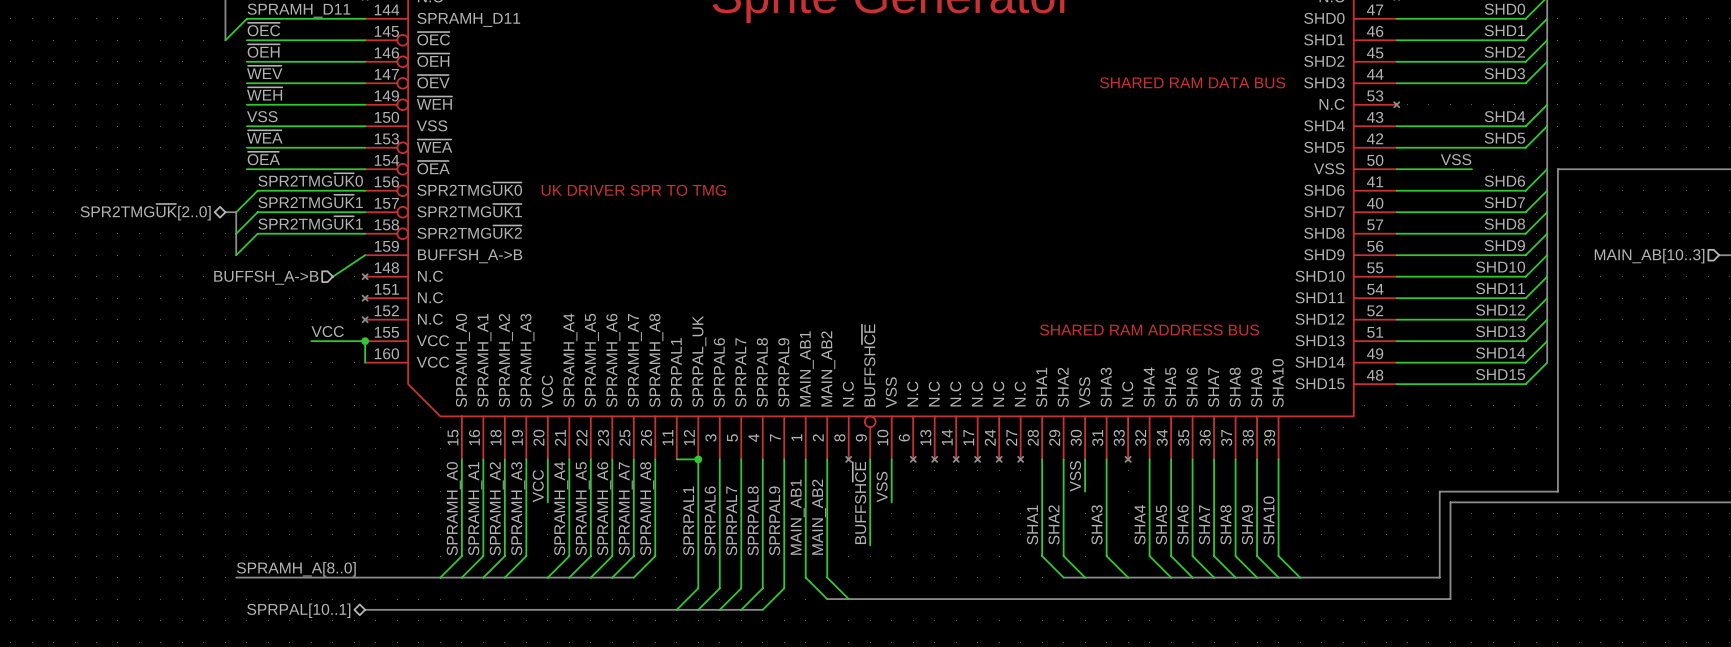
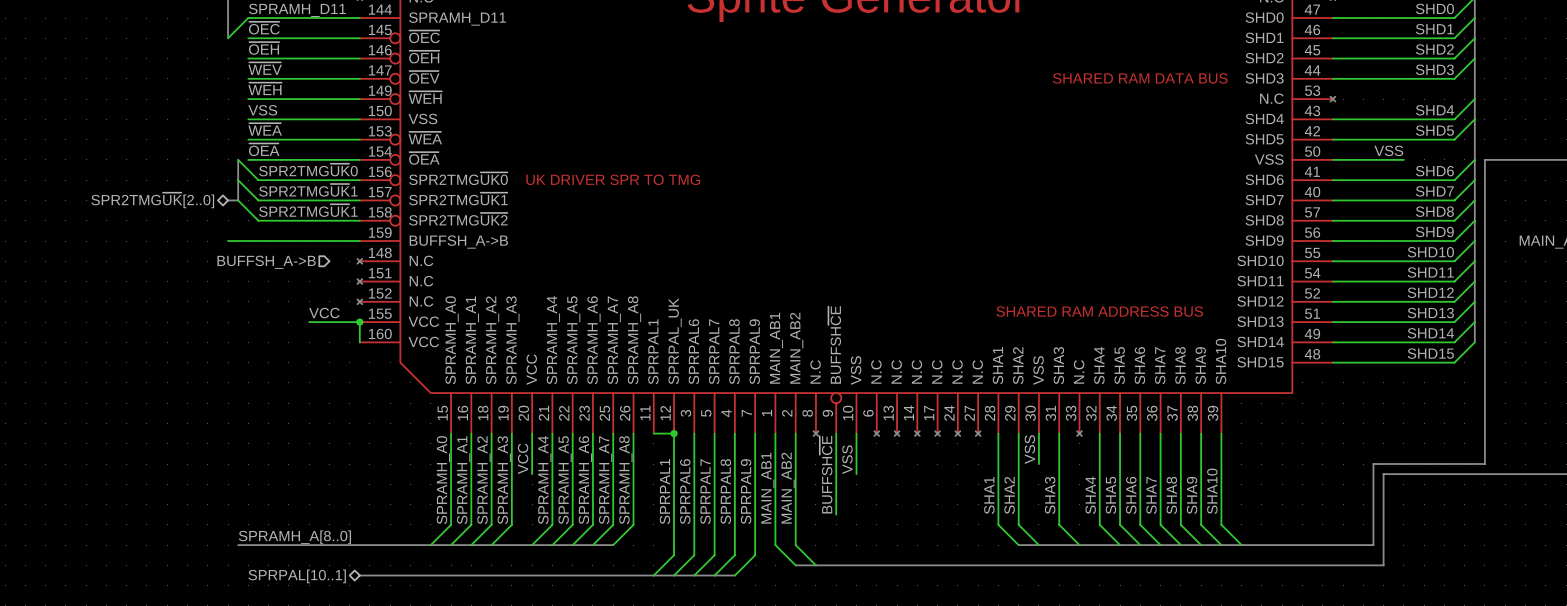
wire: none -> (238, 159) (258, 180)
wire: (257, 190) (236, 212) -> (258, 220) (238, 200)
bus: (236, 212) (236, 255) -> (238, 200) (238, 159)
wire: (257, 212) (236, 233) -> (258, 200) (238, 180)
wire: (257, 233) (236, 255) -> none
wire: (365, 255) (332, 276) -> (359, 241) (228, 241)

